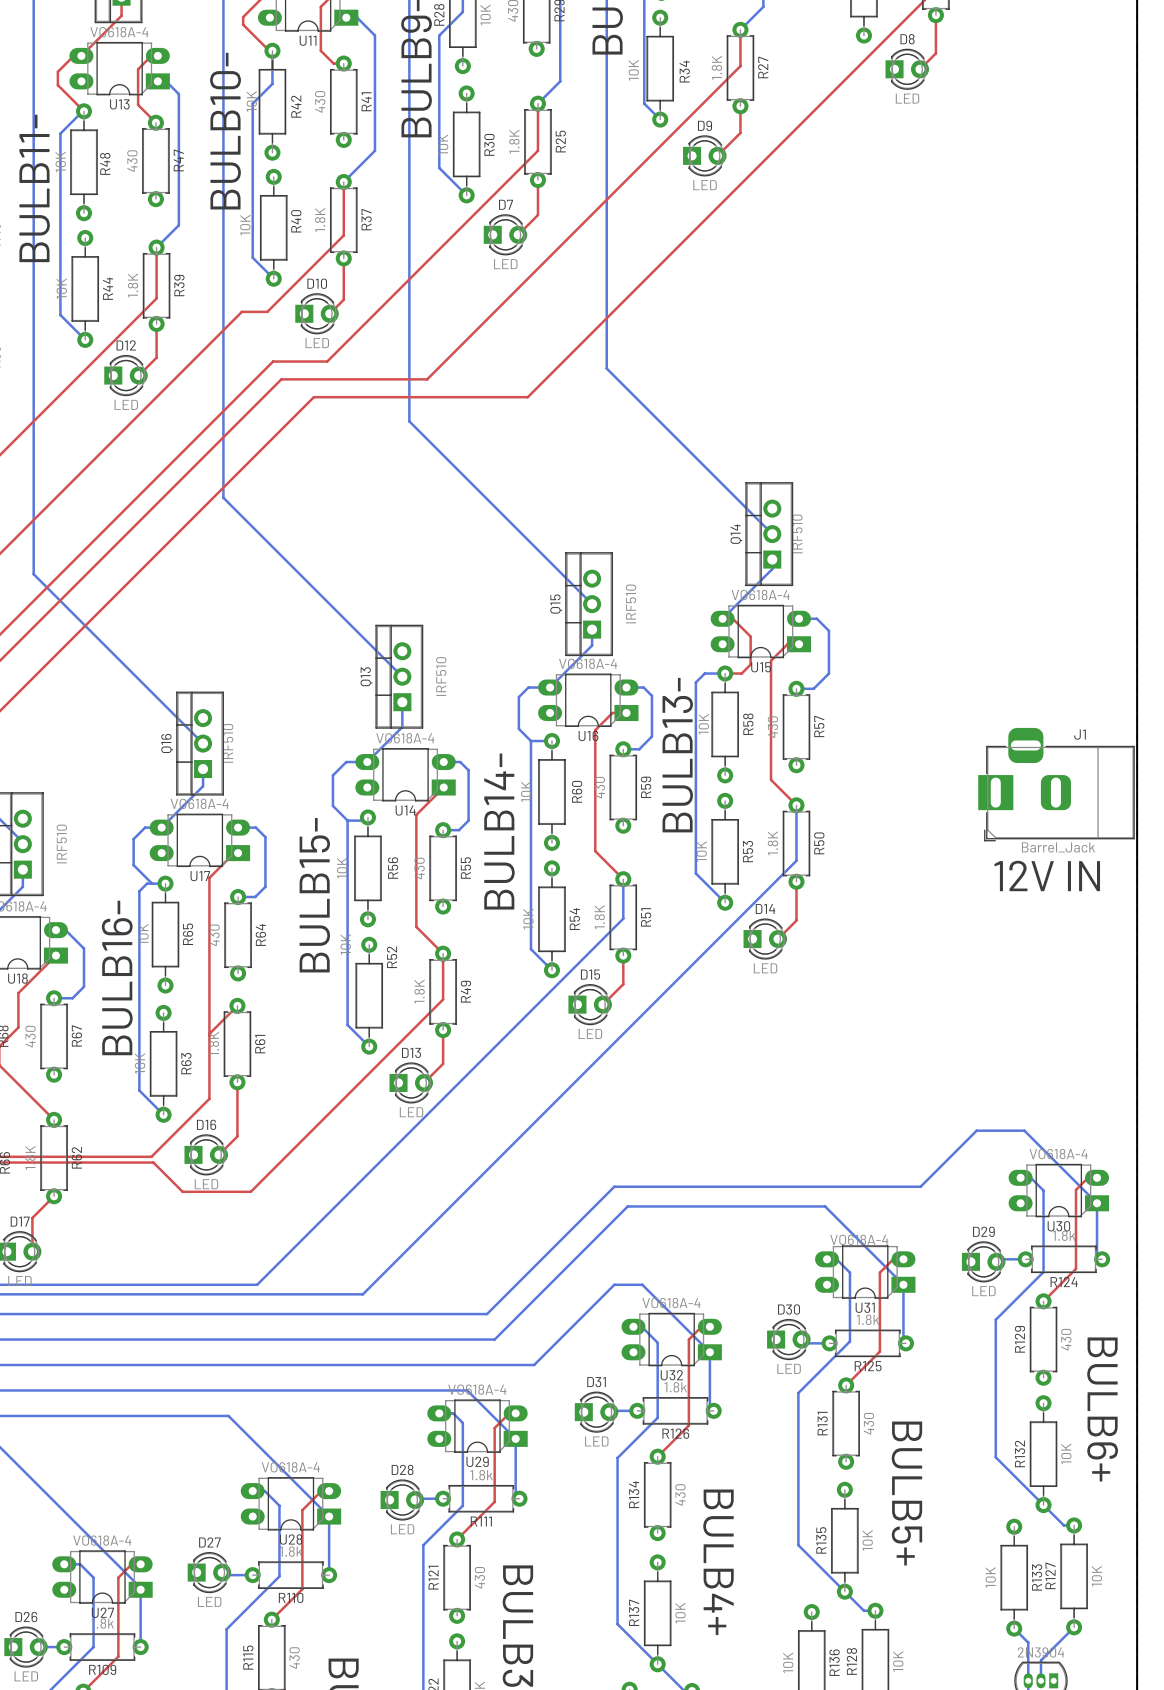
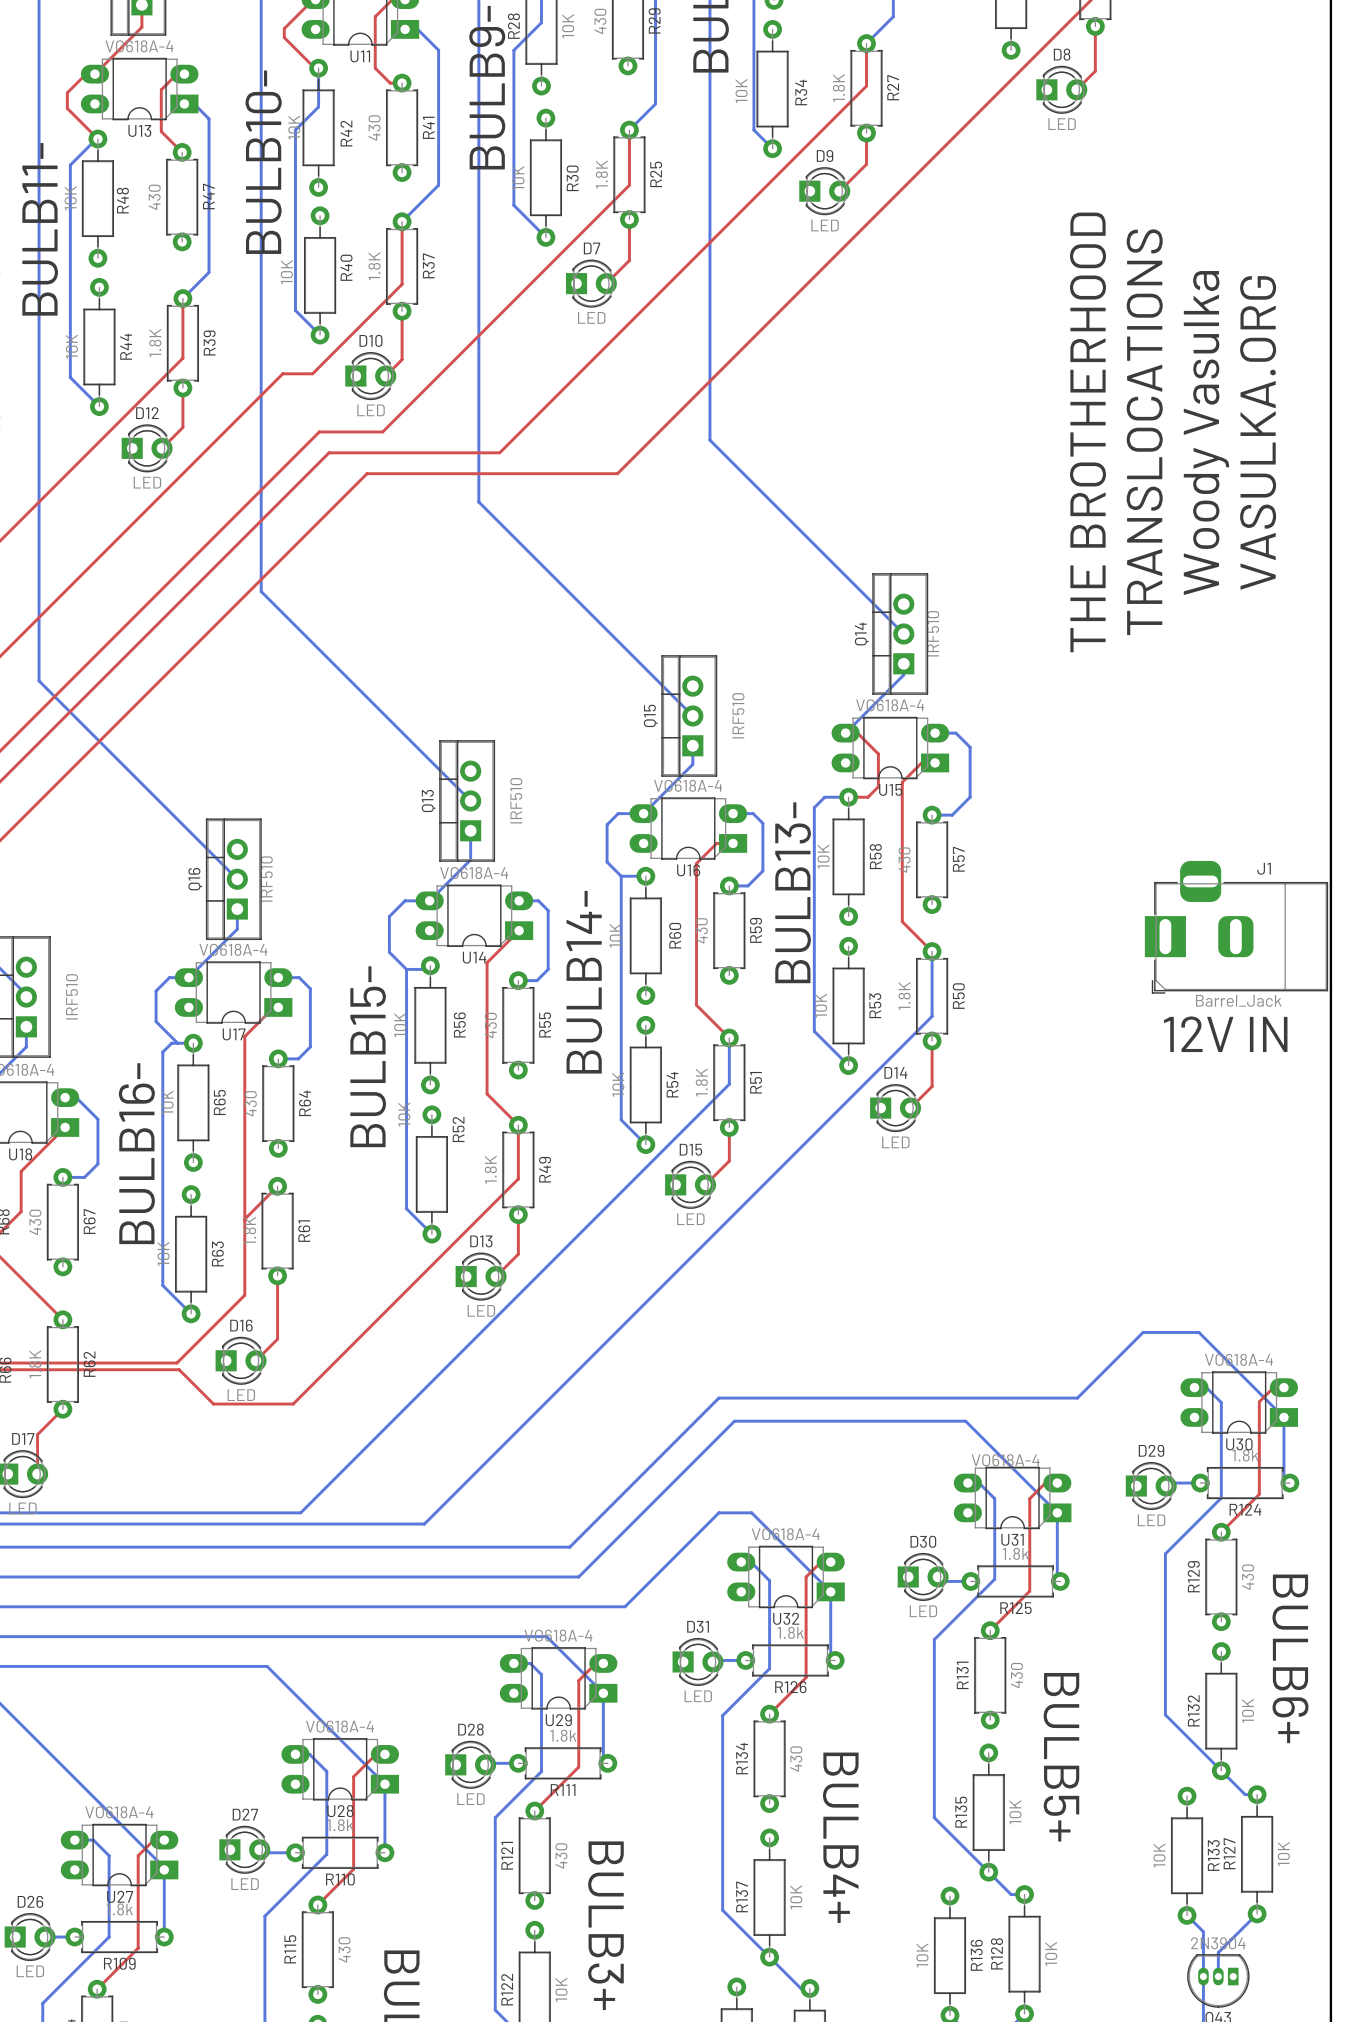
text: none -> THE BROTHERHOOD (1088, 432)
text: none -> TRANSLOCATIONS (1144, 432)
text: none -> Woody Vasulka (1206, 432)
text: none -> VASULKA.ORG (1258, 432)

